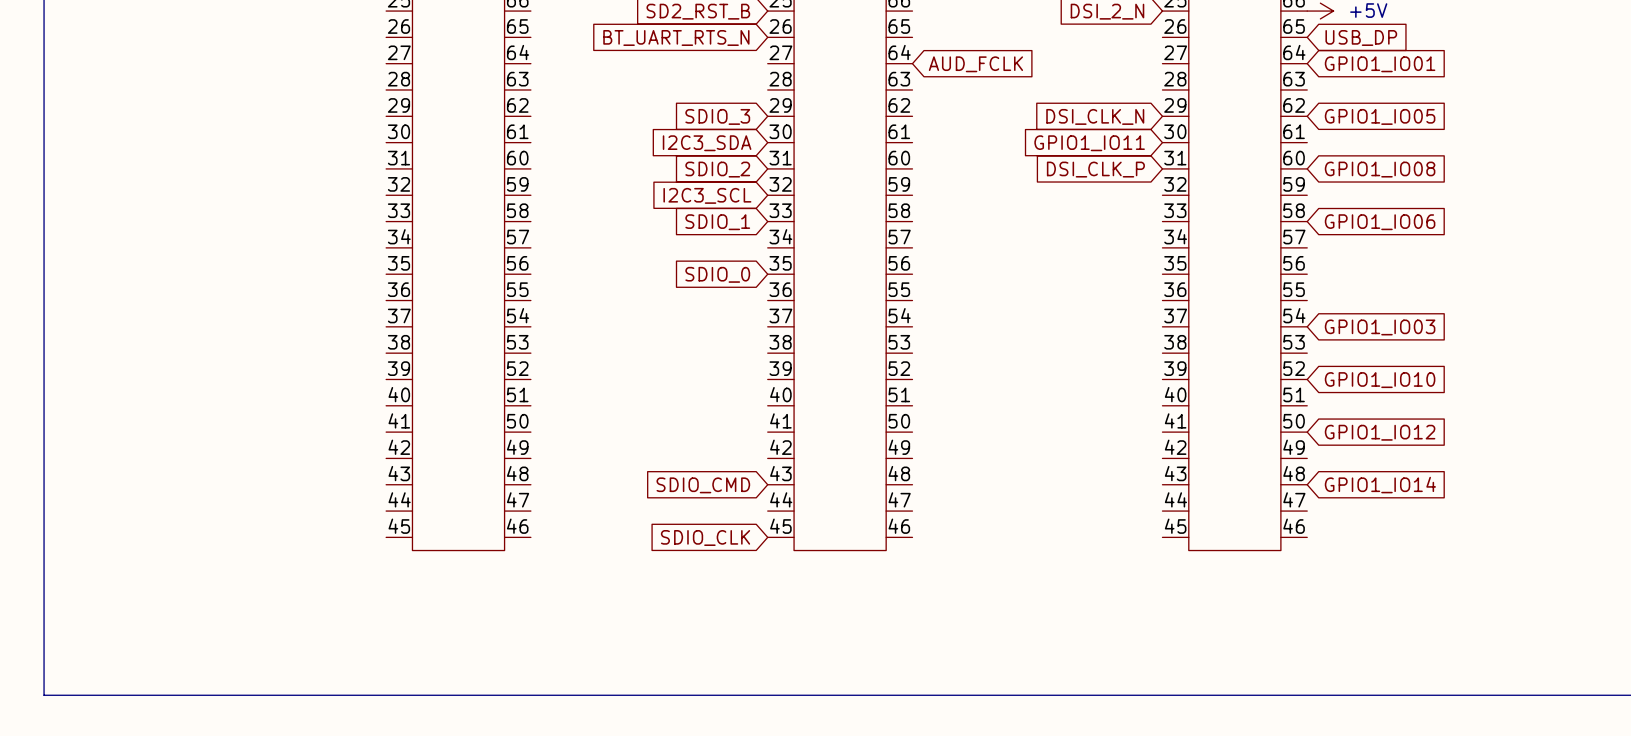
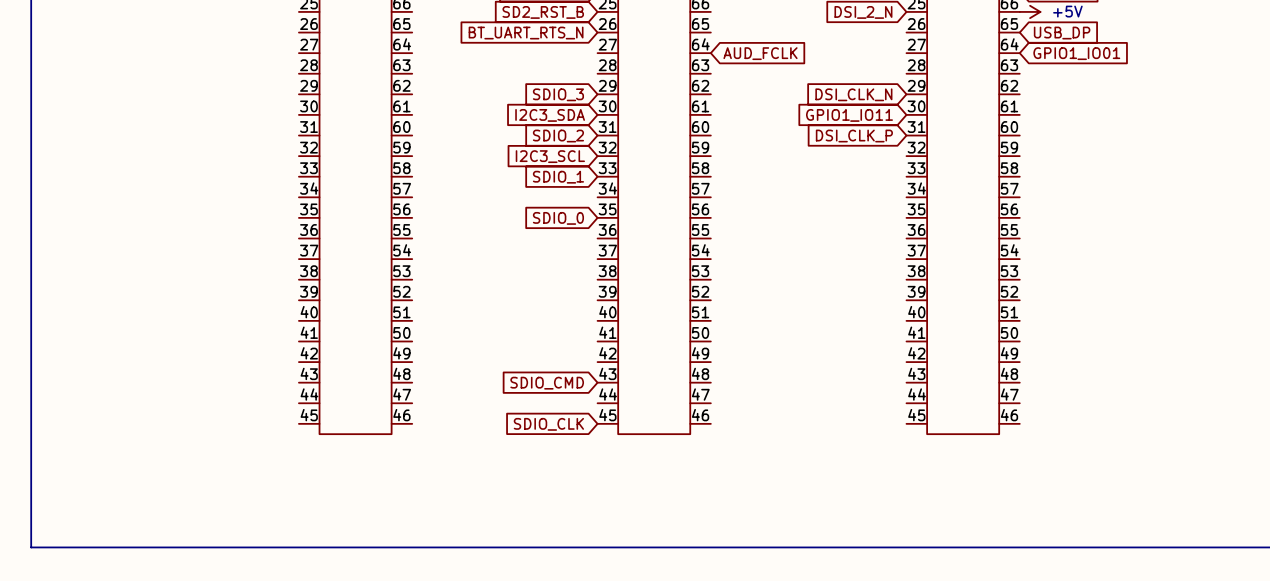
global label: GPIO1_IO05 (1380, 116) -> none
global label: GPIO1_IO08 (1380, 169) -> none
global label: GPIO1_IO06 (1380, 222) -> none
global label: GPIO1_IO03 (1380, 327) -> none
global label: GPIO1_IO10 (1380, 380) -> none
global label: GPIO1_IO12 (1380, 432) -> none
global label: GPIO1_IO14 (1380, 485) -> none

